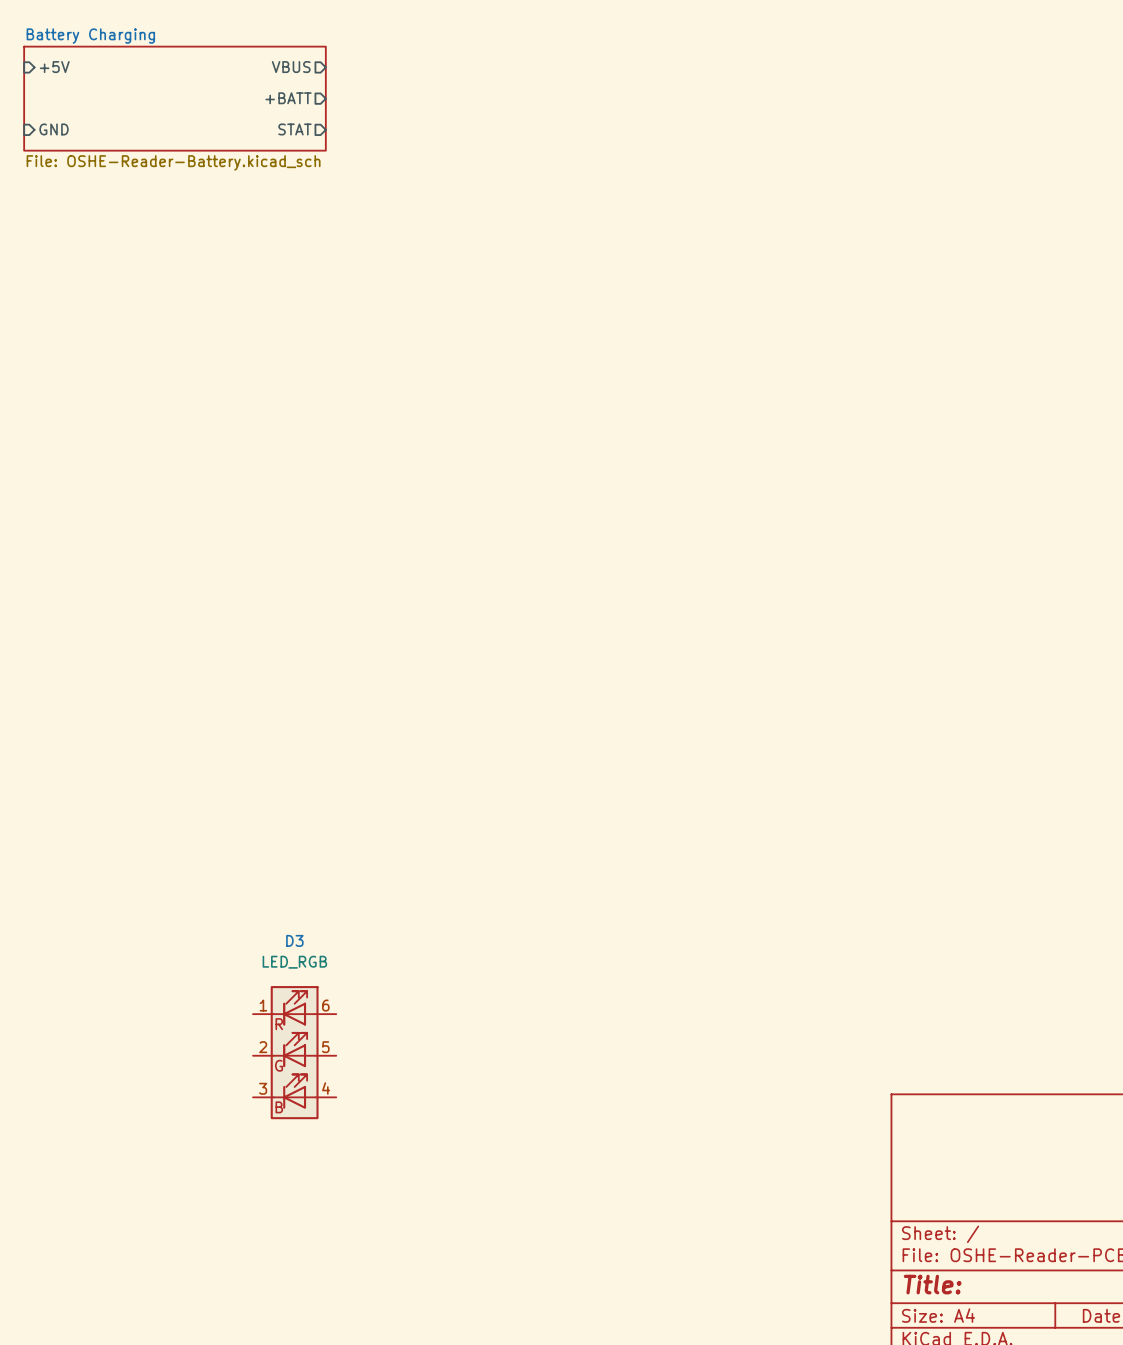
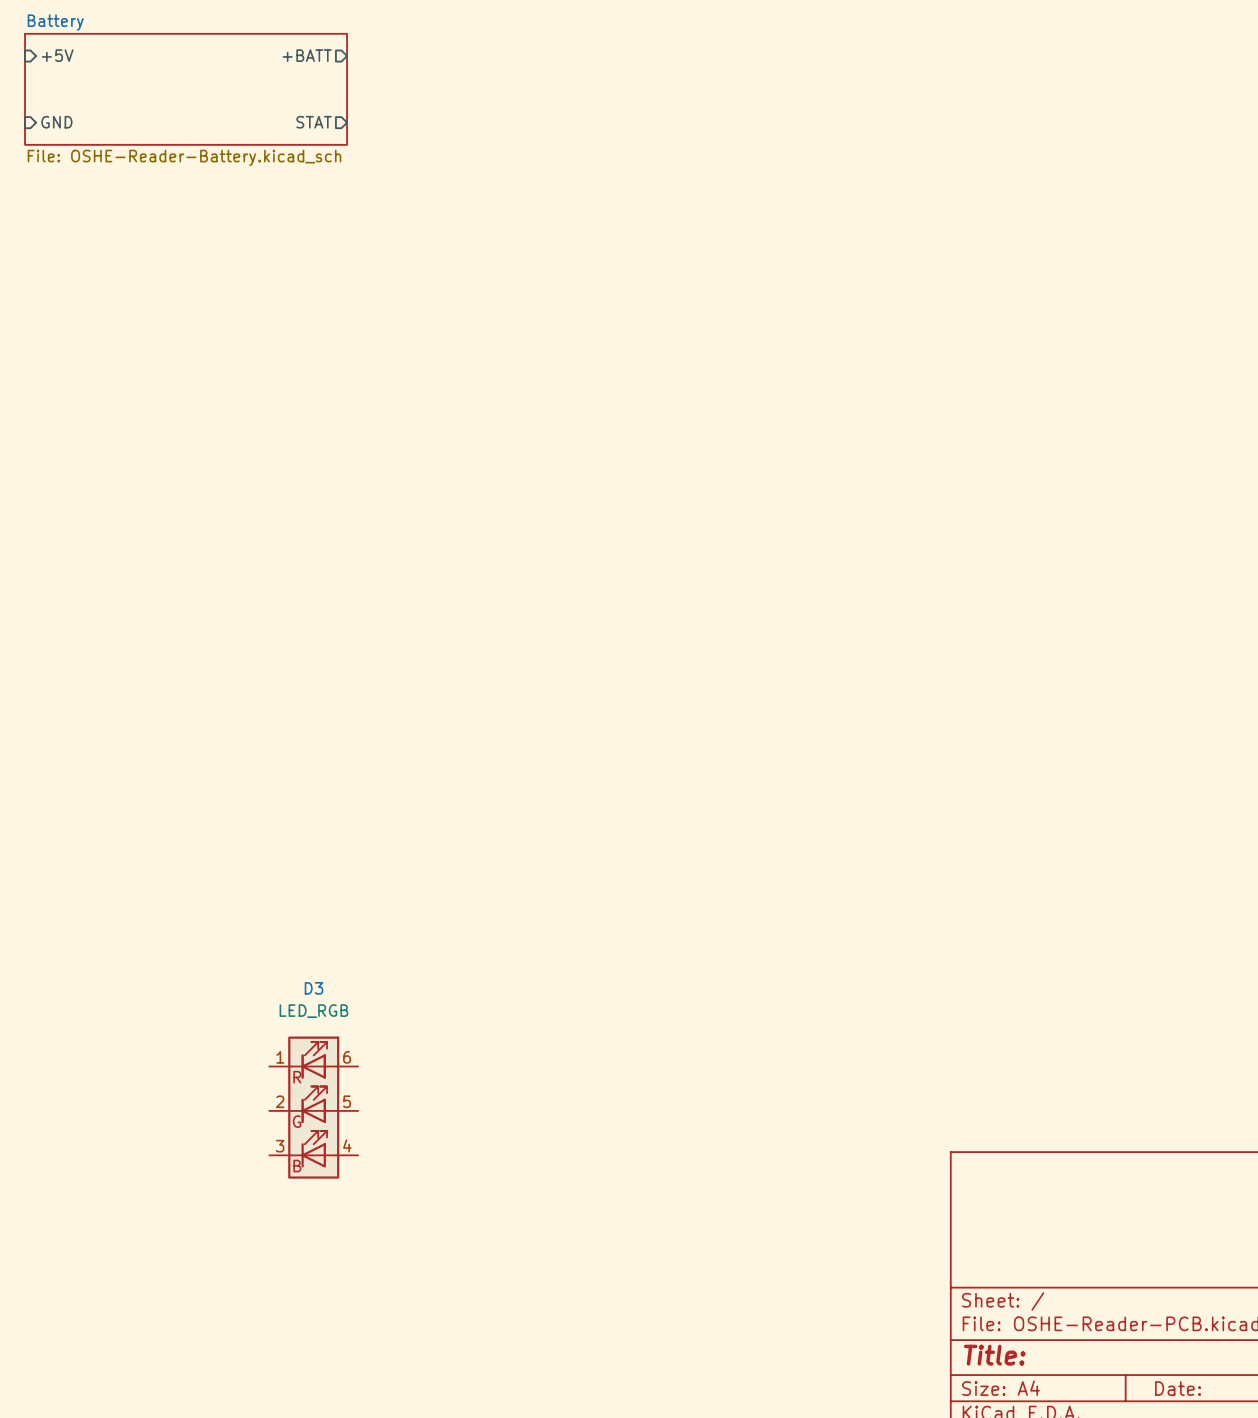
sheet Battery Charging name: Battery Charging (90, 36) -> Battery (55, 22)
sheet pin: VBUS (291, 67) -> +BATT (307, 55)
sheet pin: +BATT (288, 98) -> none

